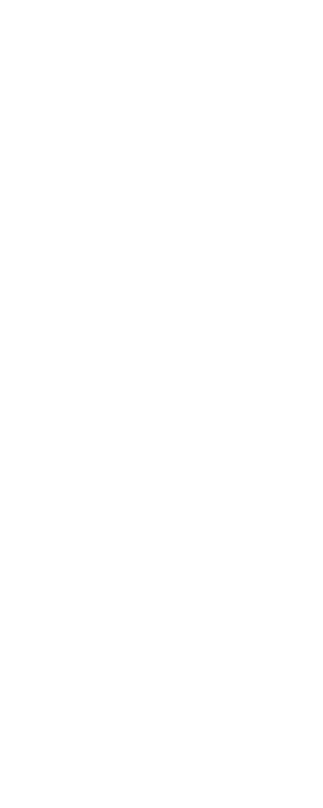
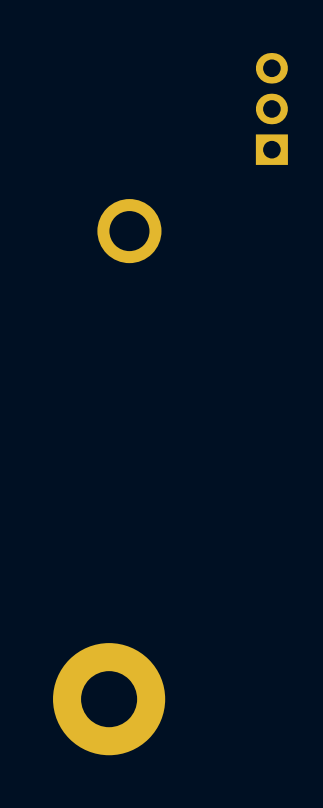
part: none -> (271, 108)
part: none -> (129, 231)
part: none -> (109, 699)

